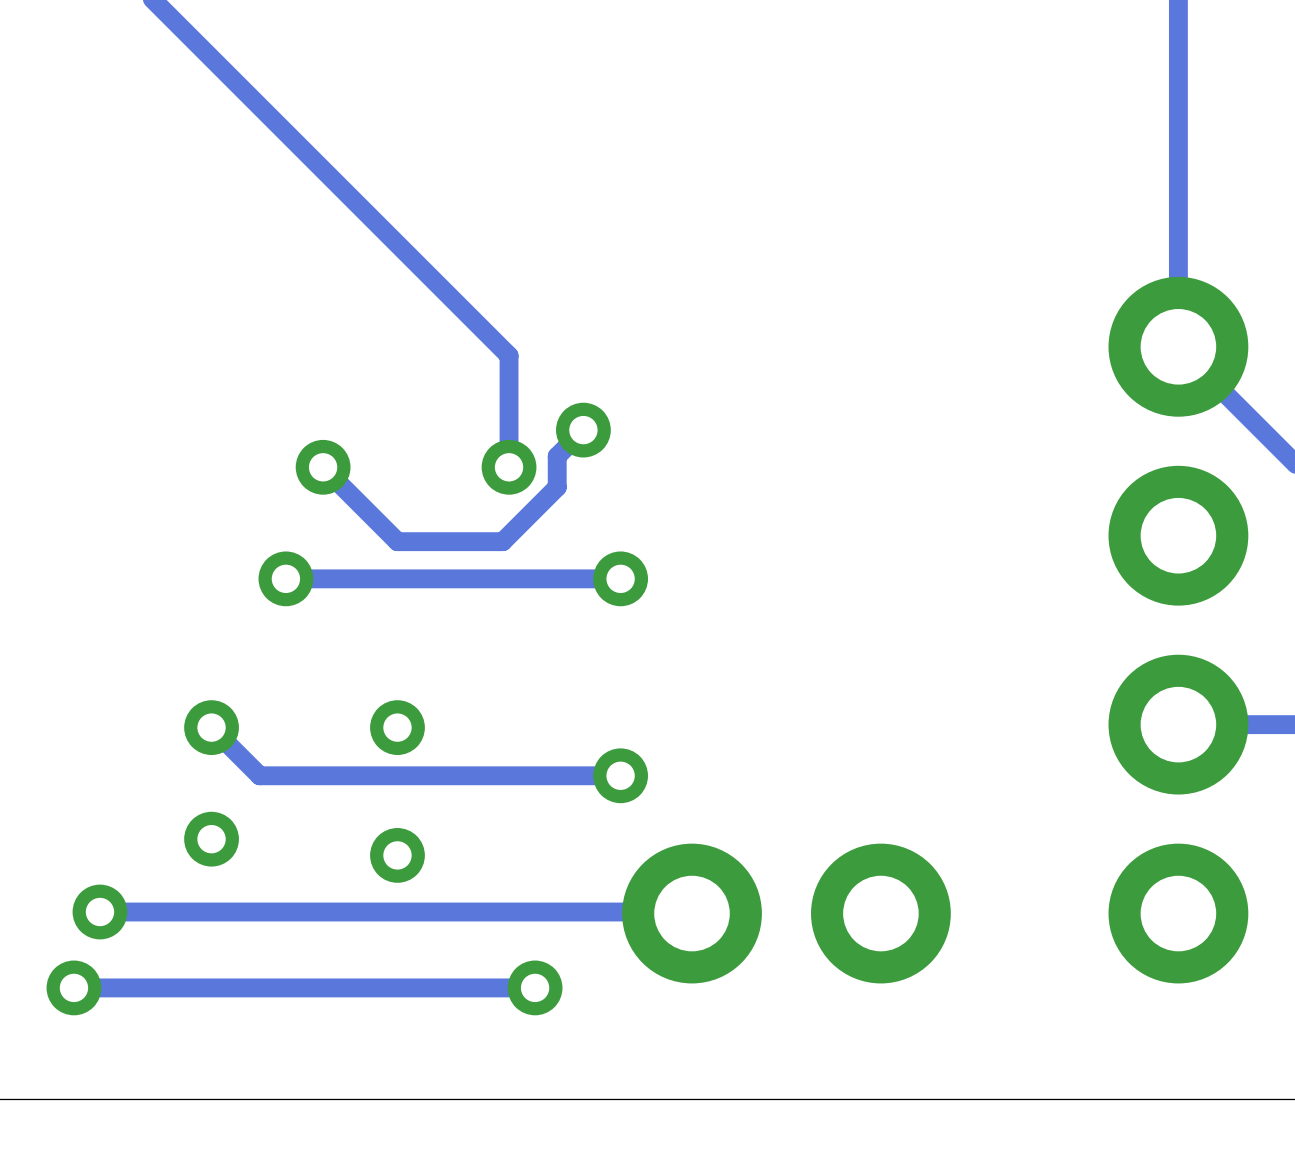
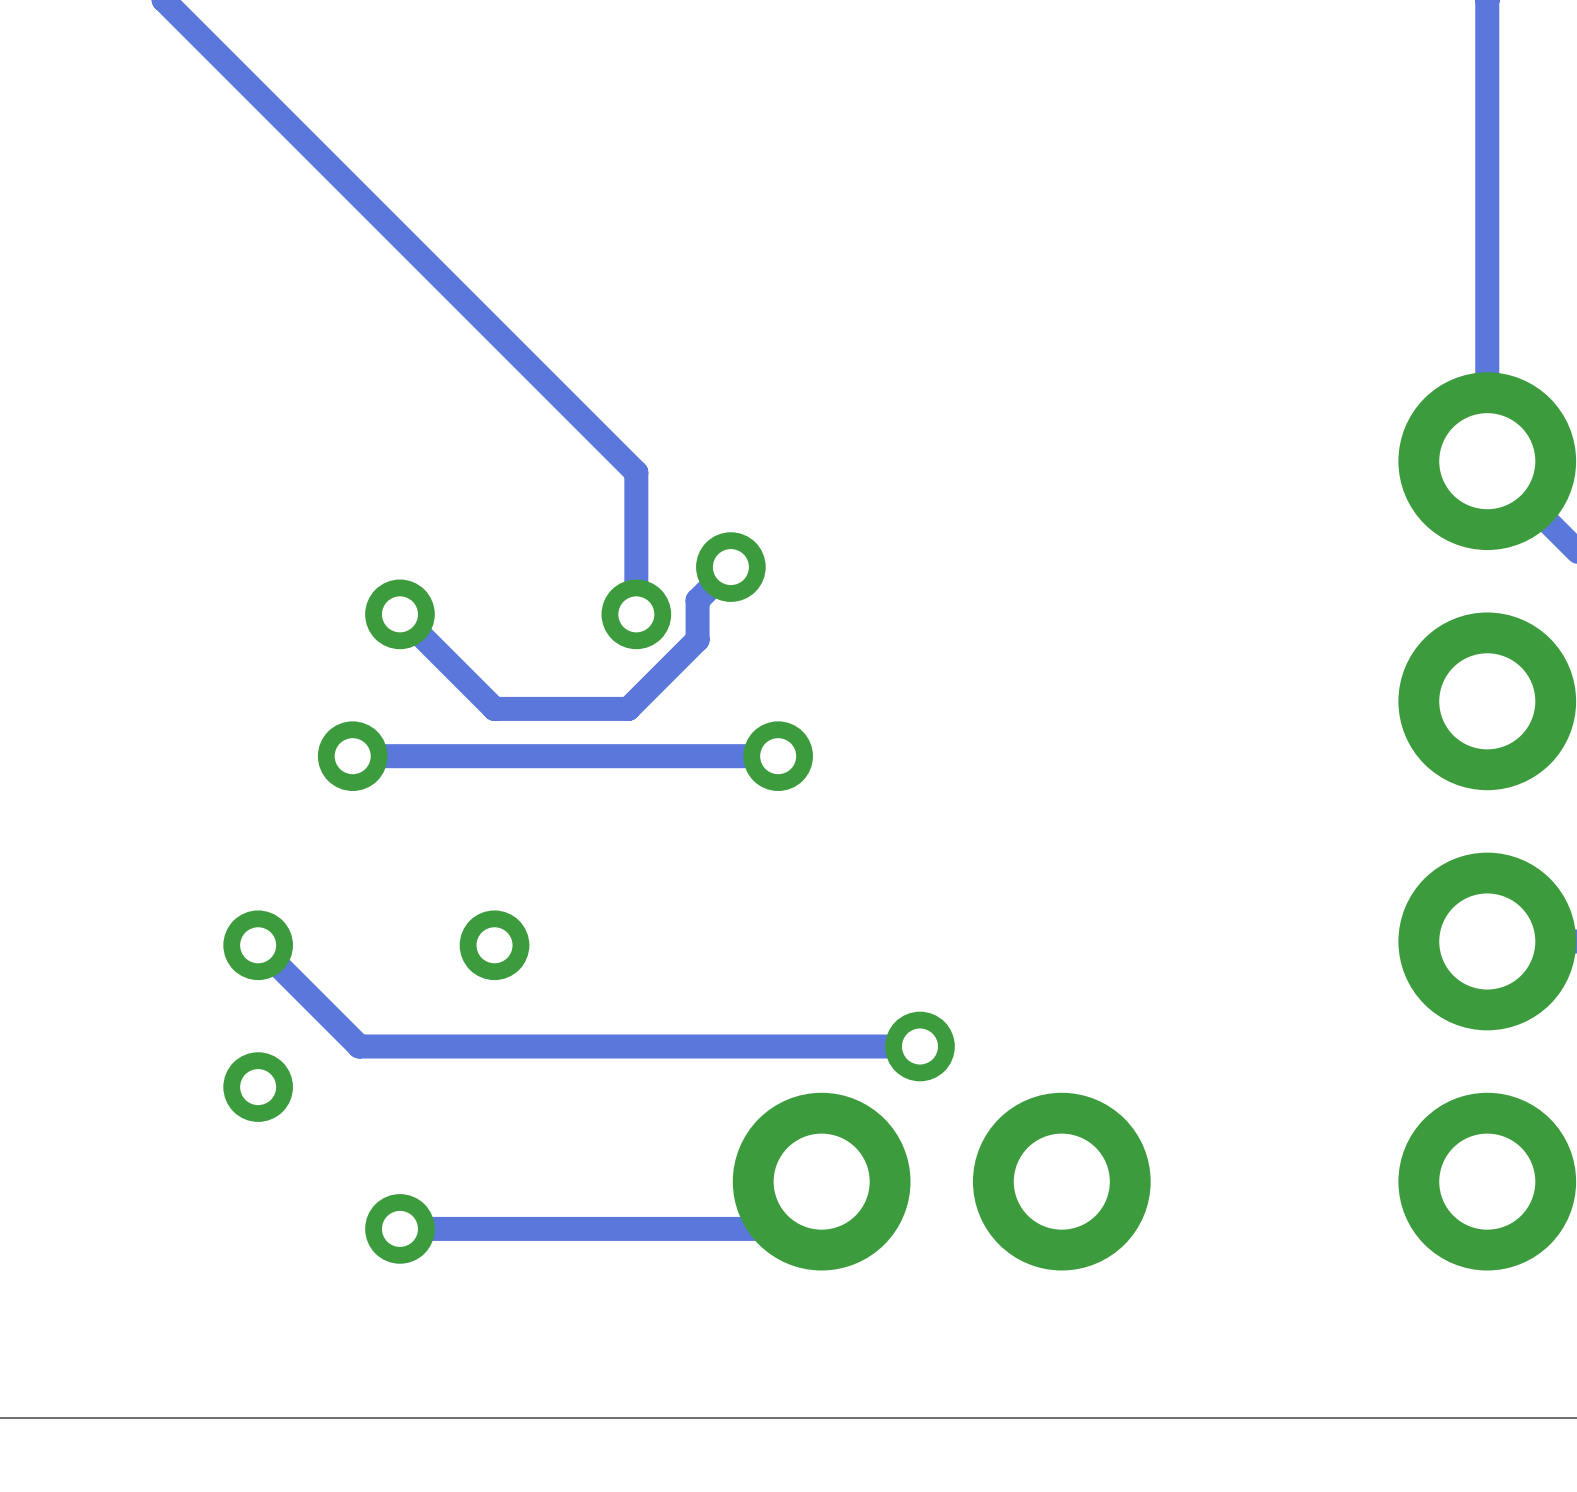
track: (620, 775) (259, 775) -> (919, 1046) (359, 1046) (319, 1006)
via position: (620, 775) -> (919, 1046)
via: (397, 855) -> none
track: (99, 912) (690, 912) (692, 913) -> none
via: (99, 912) -> none
track: none -> (821, 1181) (774, 1228) (399, 1228)
part position: (786, 913) -> (941, 1181)
via: none -> (399, 1228)
via: (73, 987) -> none
track: (535, 987) (73, 987) -> none
via: (535, 987) -> none

